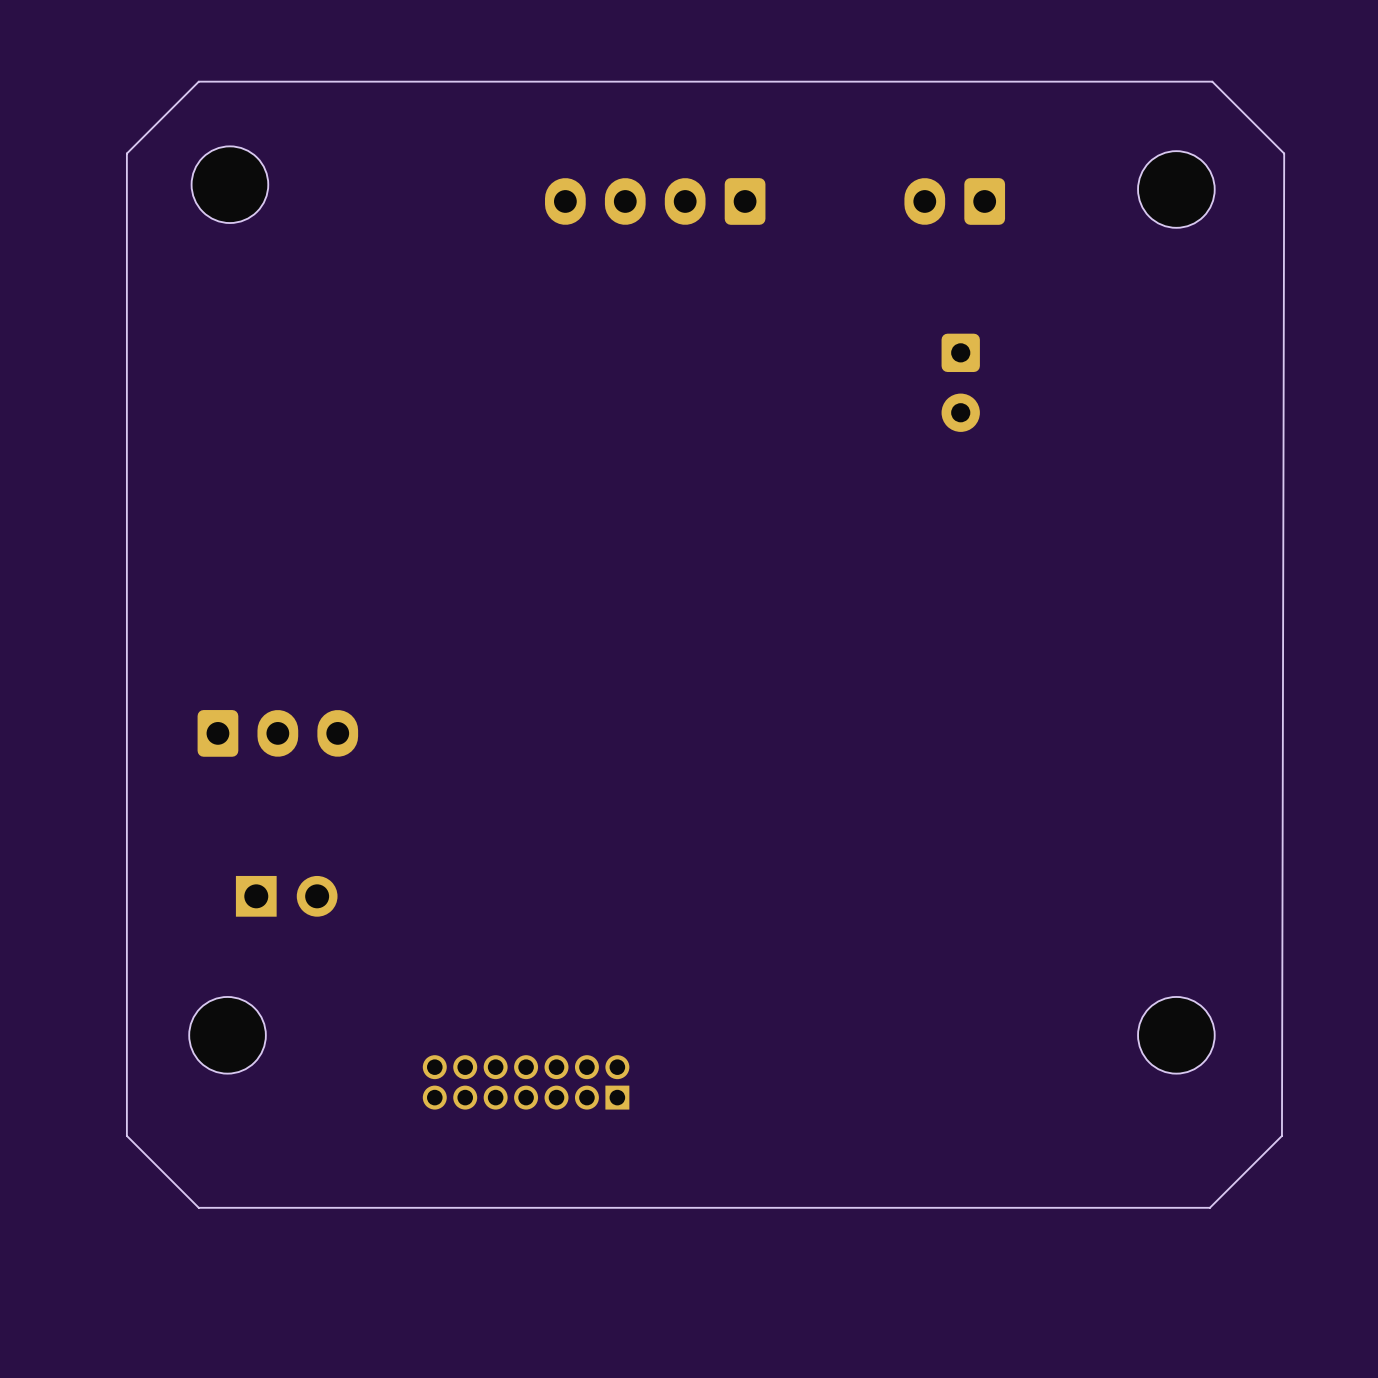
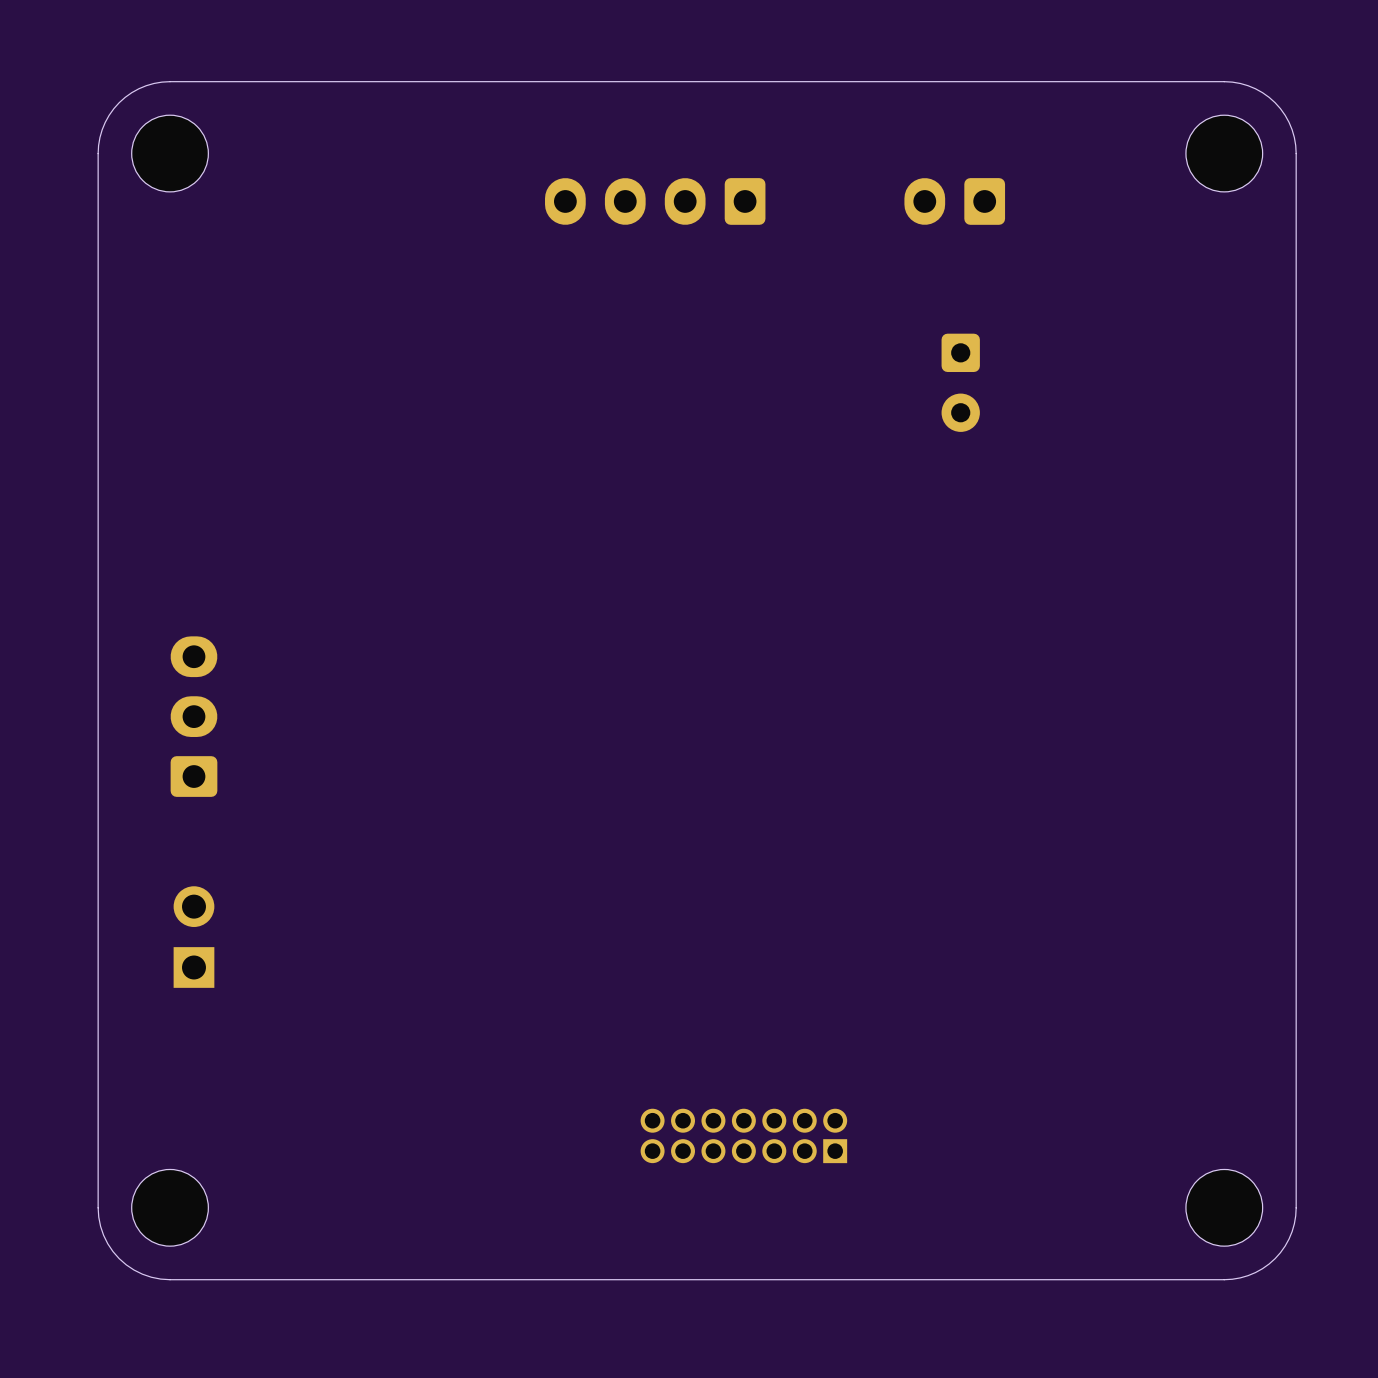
board edge: (1212, 81) (1284, 153) (1281, 1135) (1209, 1207) (198, 1207) (126, 1135) (126, 153) (198, 81) -> (1212, 81) (1240, 83) (1255, 88) (1269, 97) (1280, 108) (1289, 122) (1295, 145) (1296, 1207) (1292, 1231) (1280, 1252) (1269, 1264) (1255, 1272) (1240, 1277) (1224, 1279) (170, 1279) (142, 1274) (119, 1258) (103, 1235) (98, 1207) (98, 153) (99, 137) (105, 122) (113, 108) (125, 97) (138, 88) (154, 83) (198, 81)
part position: (229, 184) -> (170, 153)
part position: (1176, 189) -> (1224, 153)
part rotation: 0° (277, 733) -> 90° counterclockwise (193, 716)
part rotation: 0° (286, 896) -> 90° counterclockwise (193, 937)
part position: (286, 896) -> (193, 937)
part position: (227, 1035) -> (170, 1207)
part position: (1176, 1035) -> (1224, 1207)
part position: (526, 1082) -> (743, 1135)

